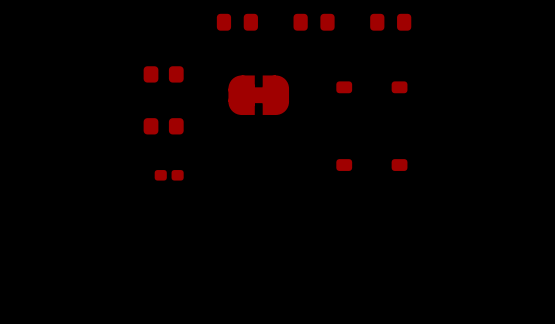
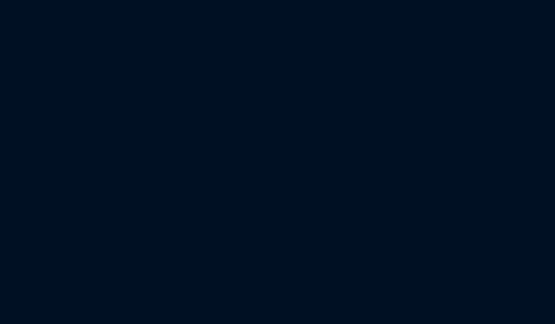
part: (237, 22) -> none
part: (314, 22) -> none
part: (390, 22) -> none
part: (163, 74) -> none
part: (371, 87) -> none
part: (258, 95) -> none
part: (163, 126) -> none
part: (371, 165) -> none
part: (169, 175) -> none

